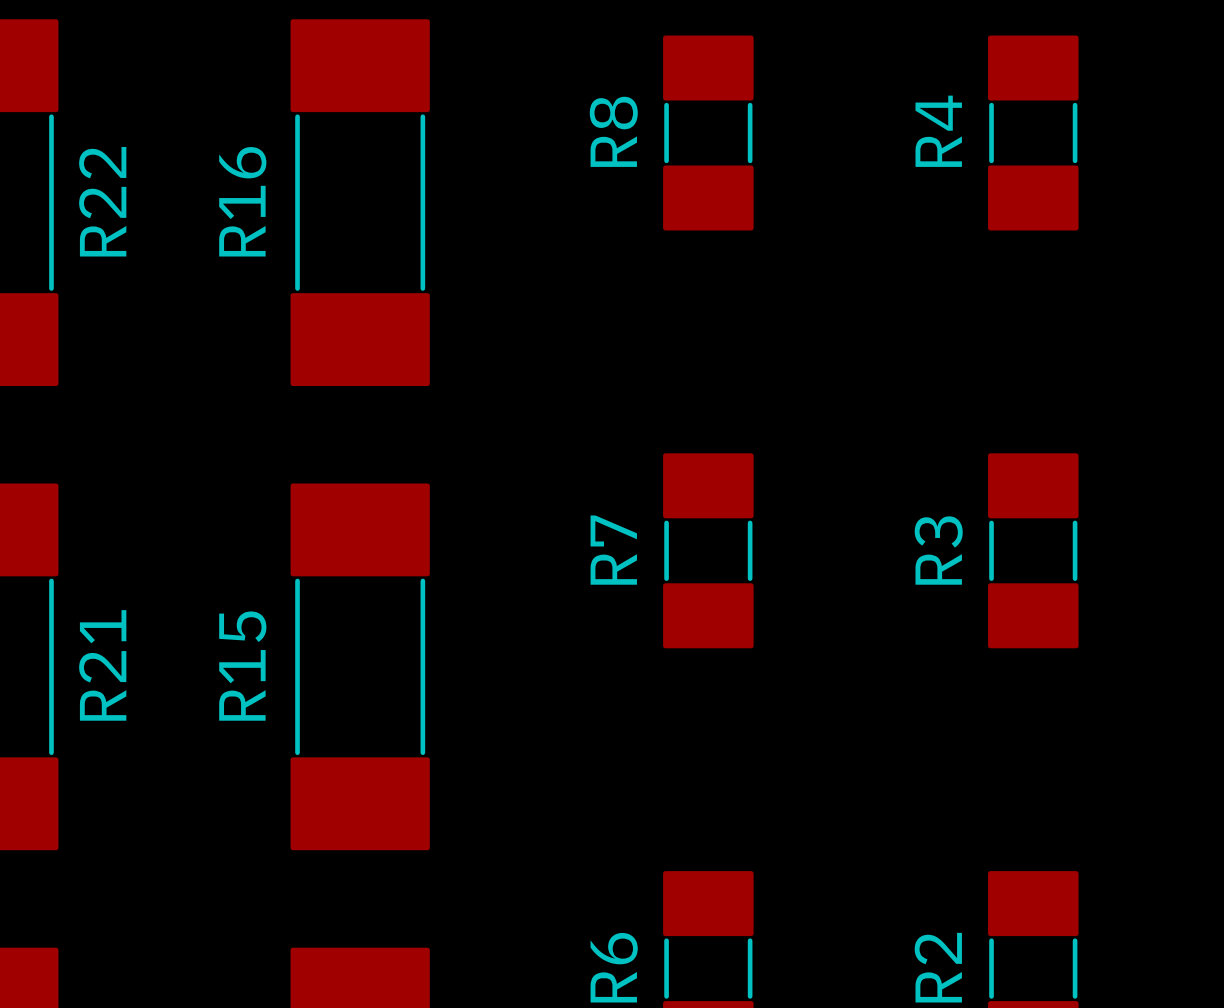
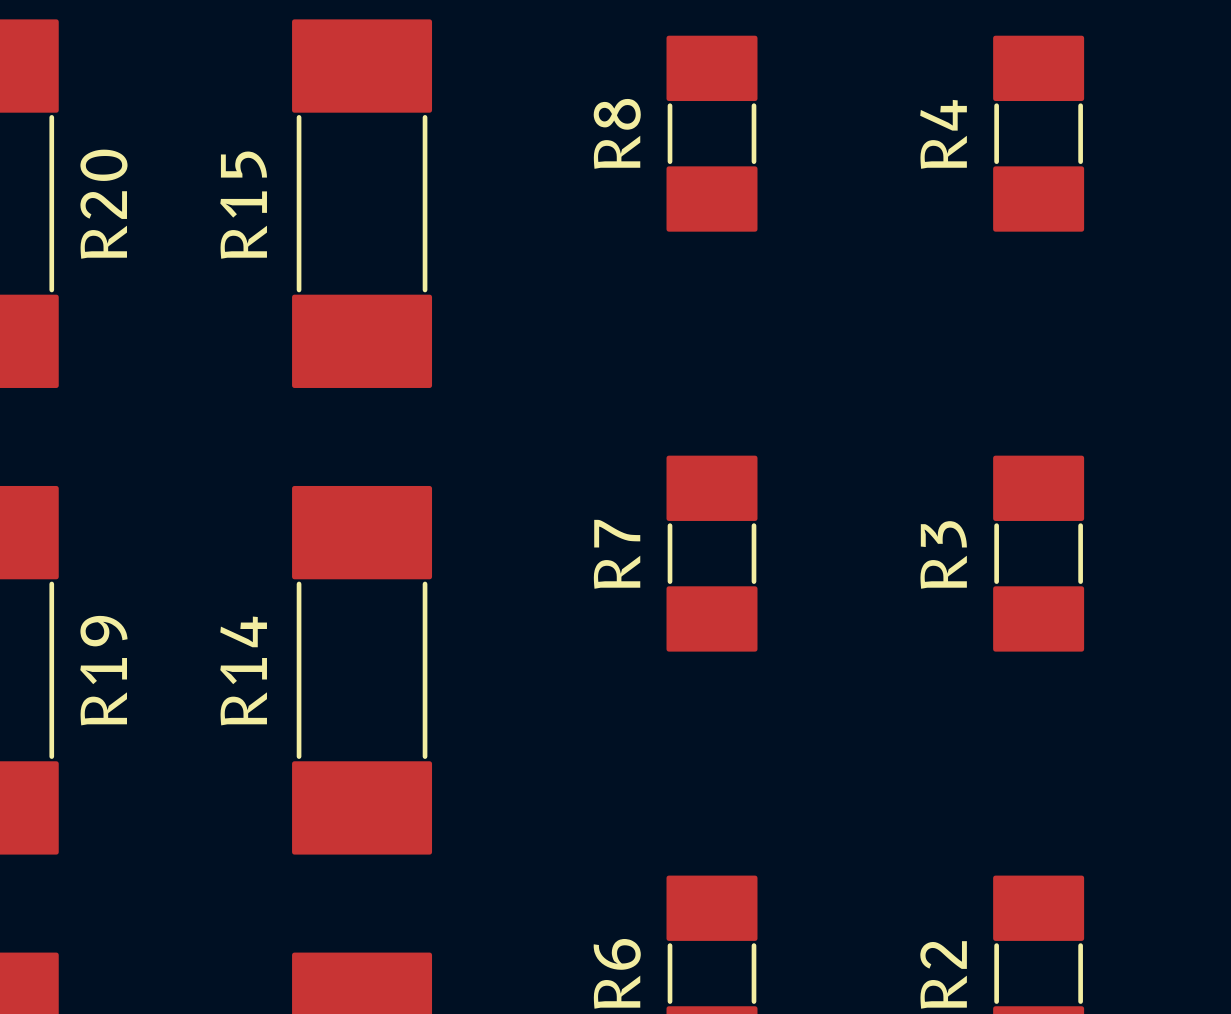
R22 name: R22 (102, 201) -> R20 (103, 204)
R16 name: R16 (242, 201) -> R15 (243, 205)
R21 name: R21 (102, 665) -> R19 (103, 670)
R15 name: R15 (242, 666) -> R14 (243, 670)

